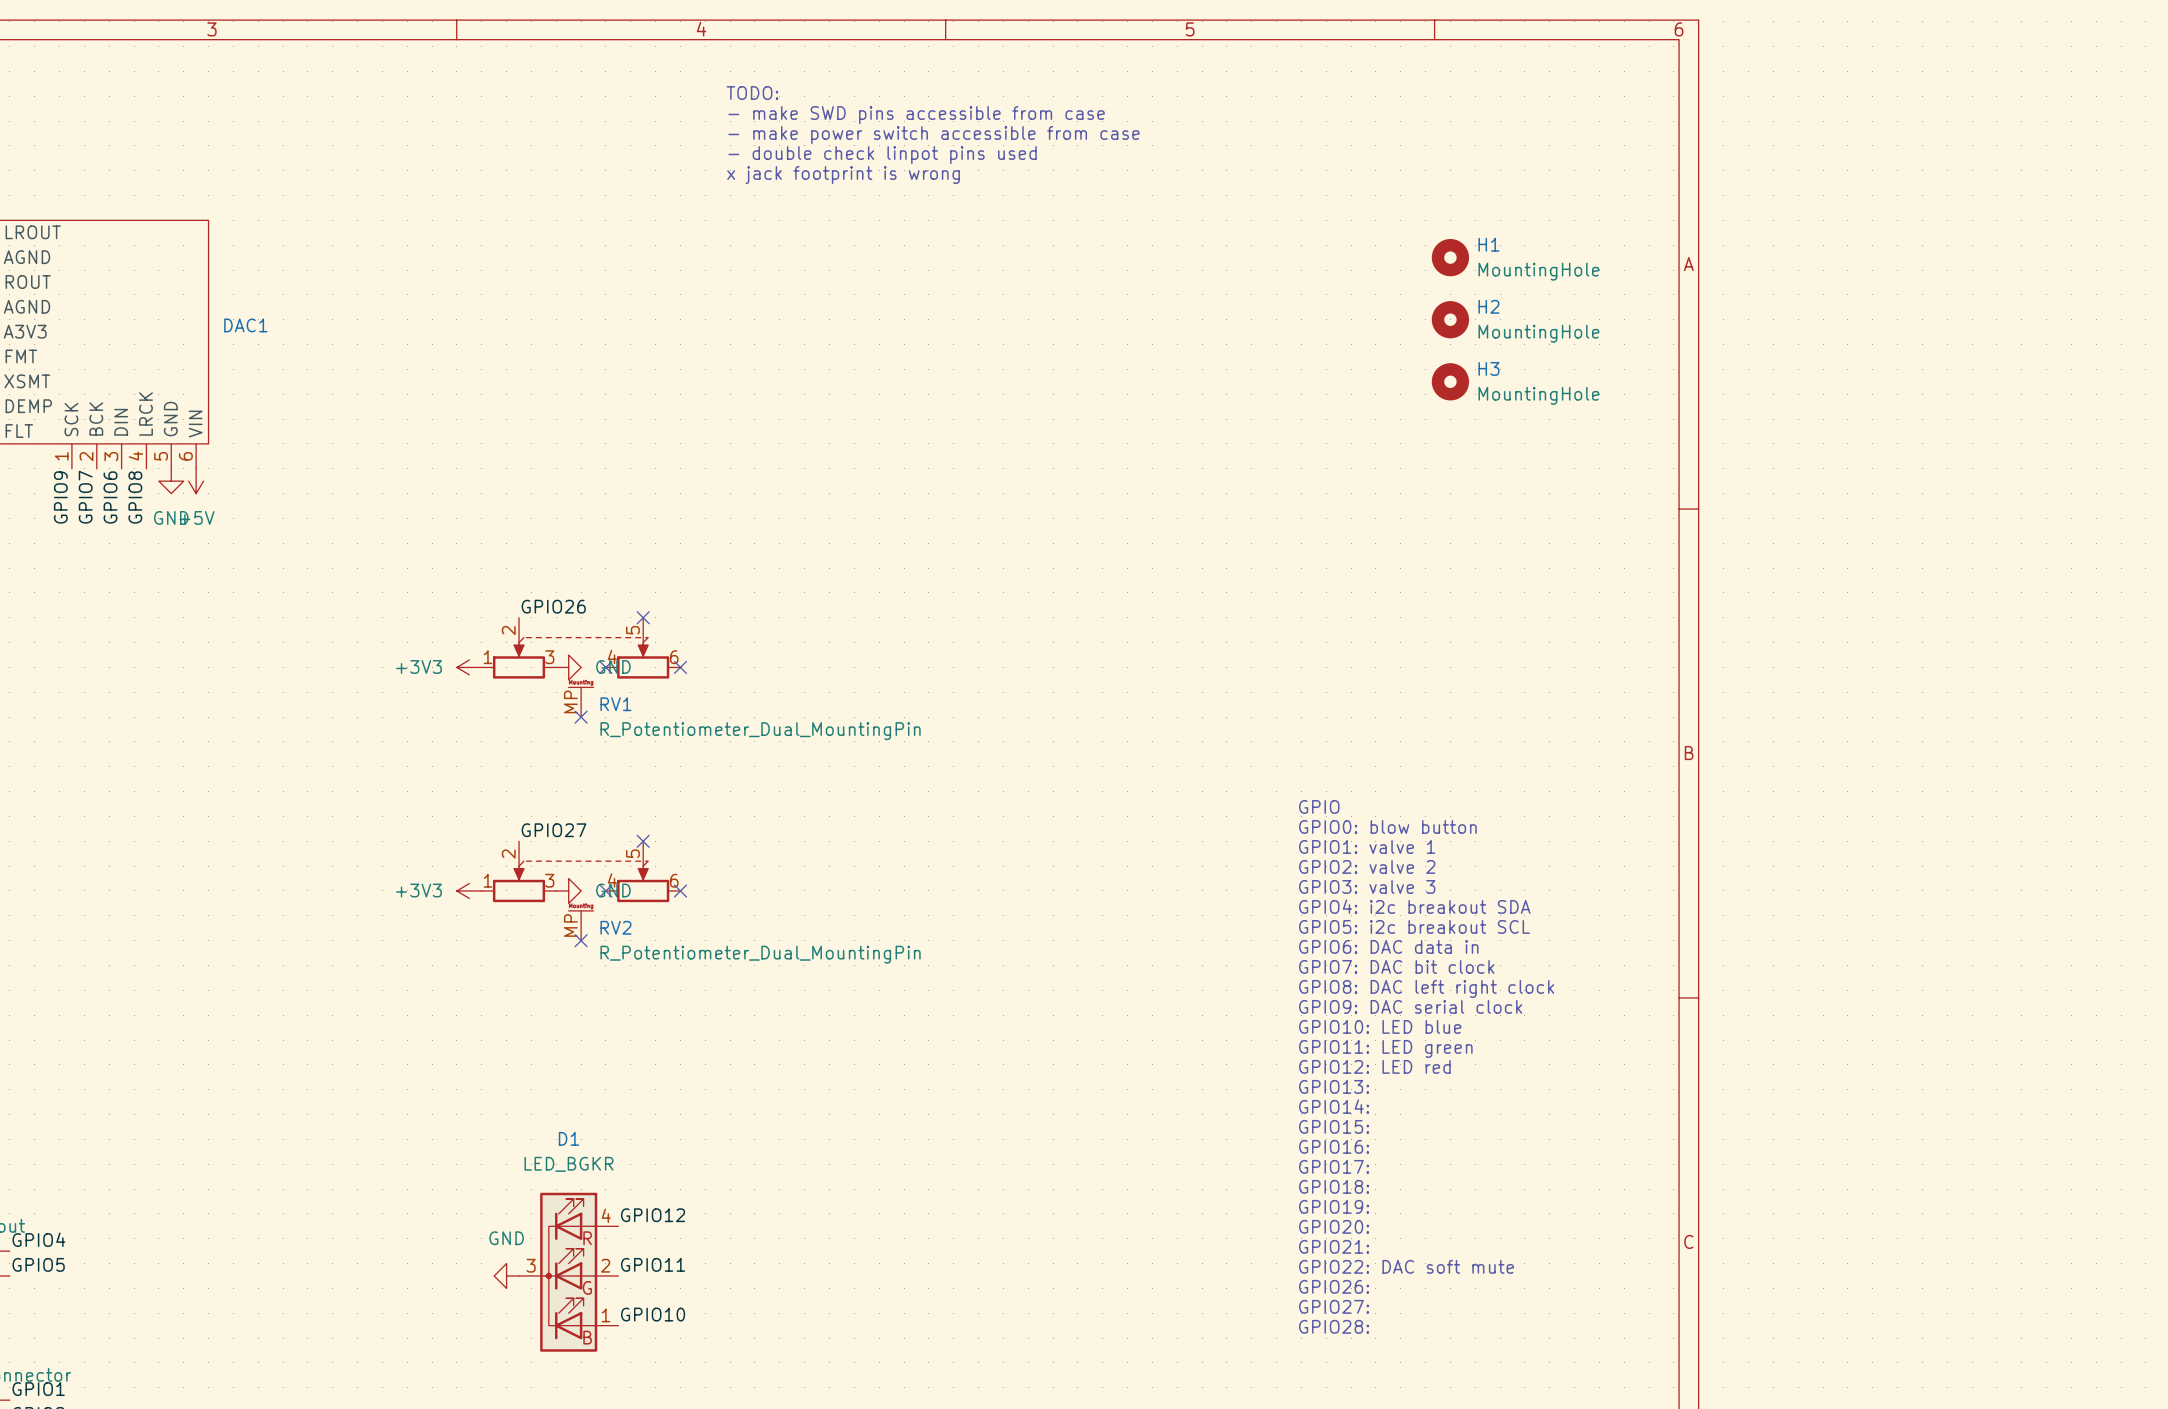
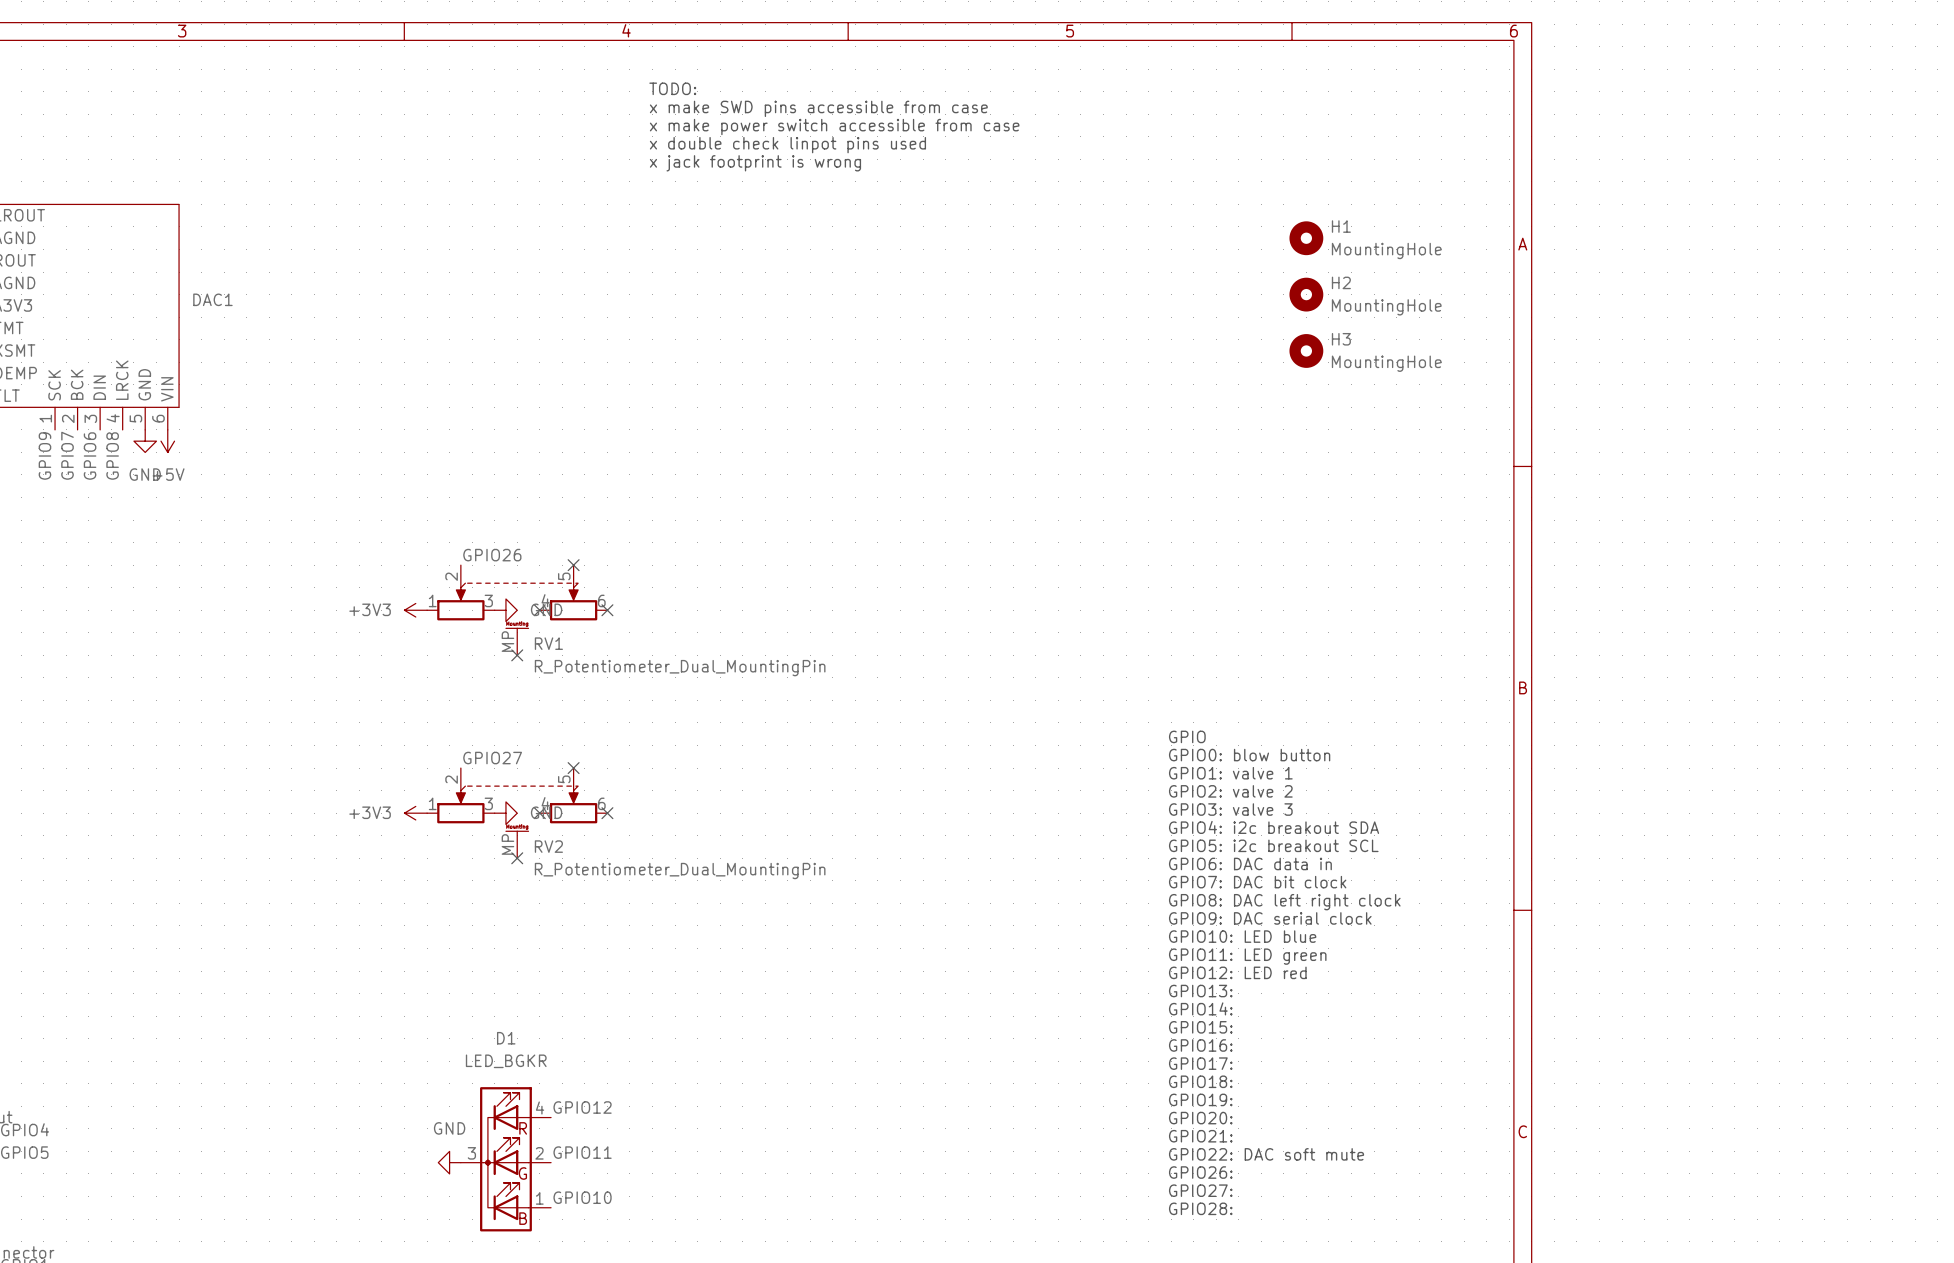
text: - make SWD pins accessible from case (916, 115) -> x make SWD pins accessible from case (818, 108)
text: - make power switch accessible from case (934, 135) -> x make power switch accessible from case (834, 127)
text: - double check linpot pins used (882, 155) -> x double check linpot pins used (787, 145)

